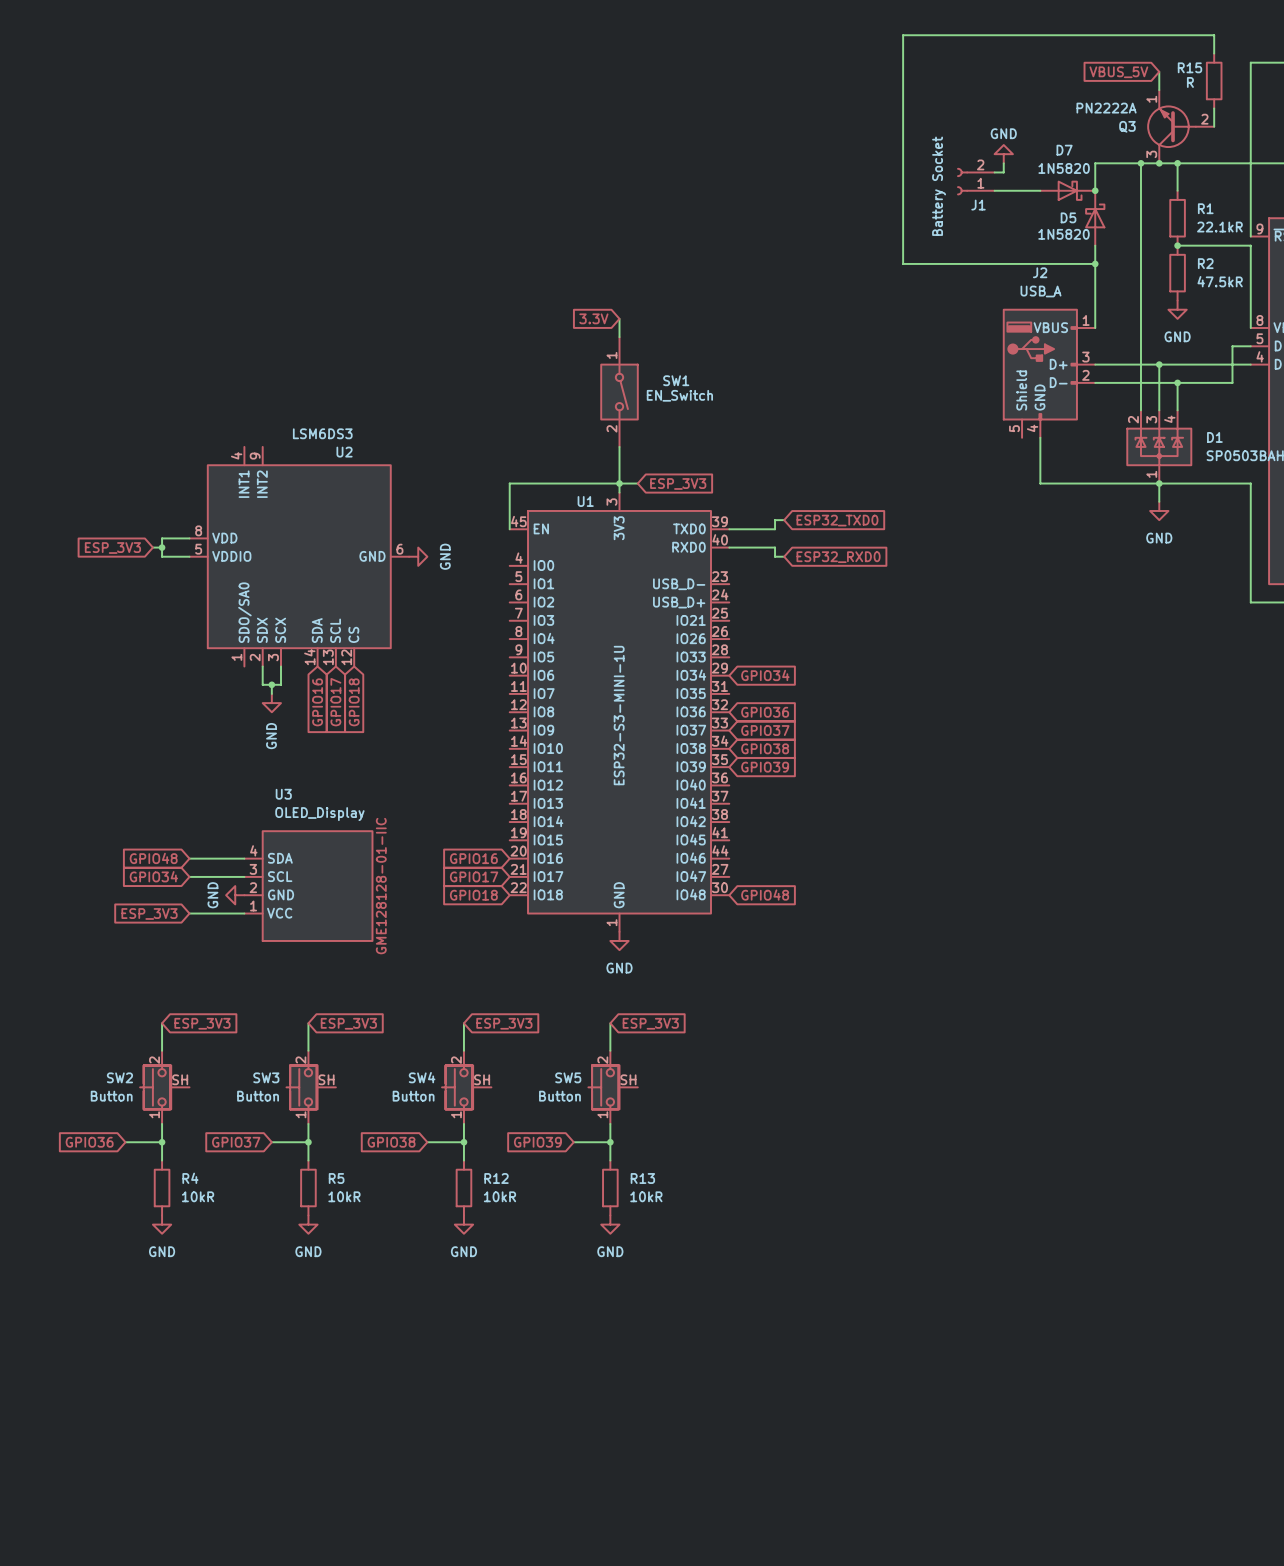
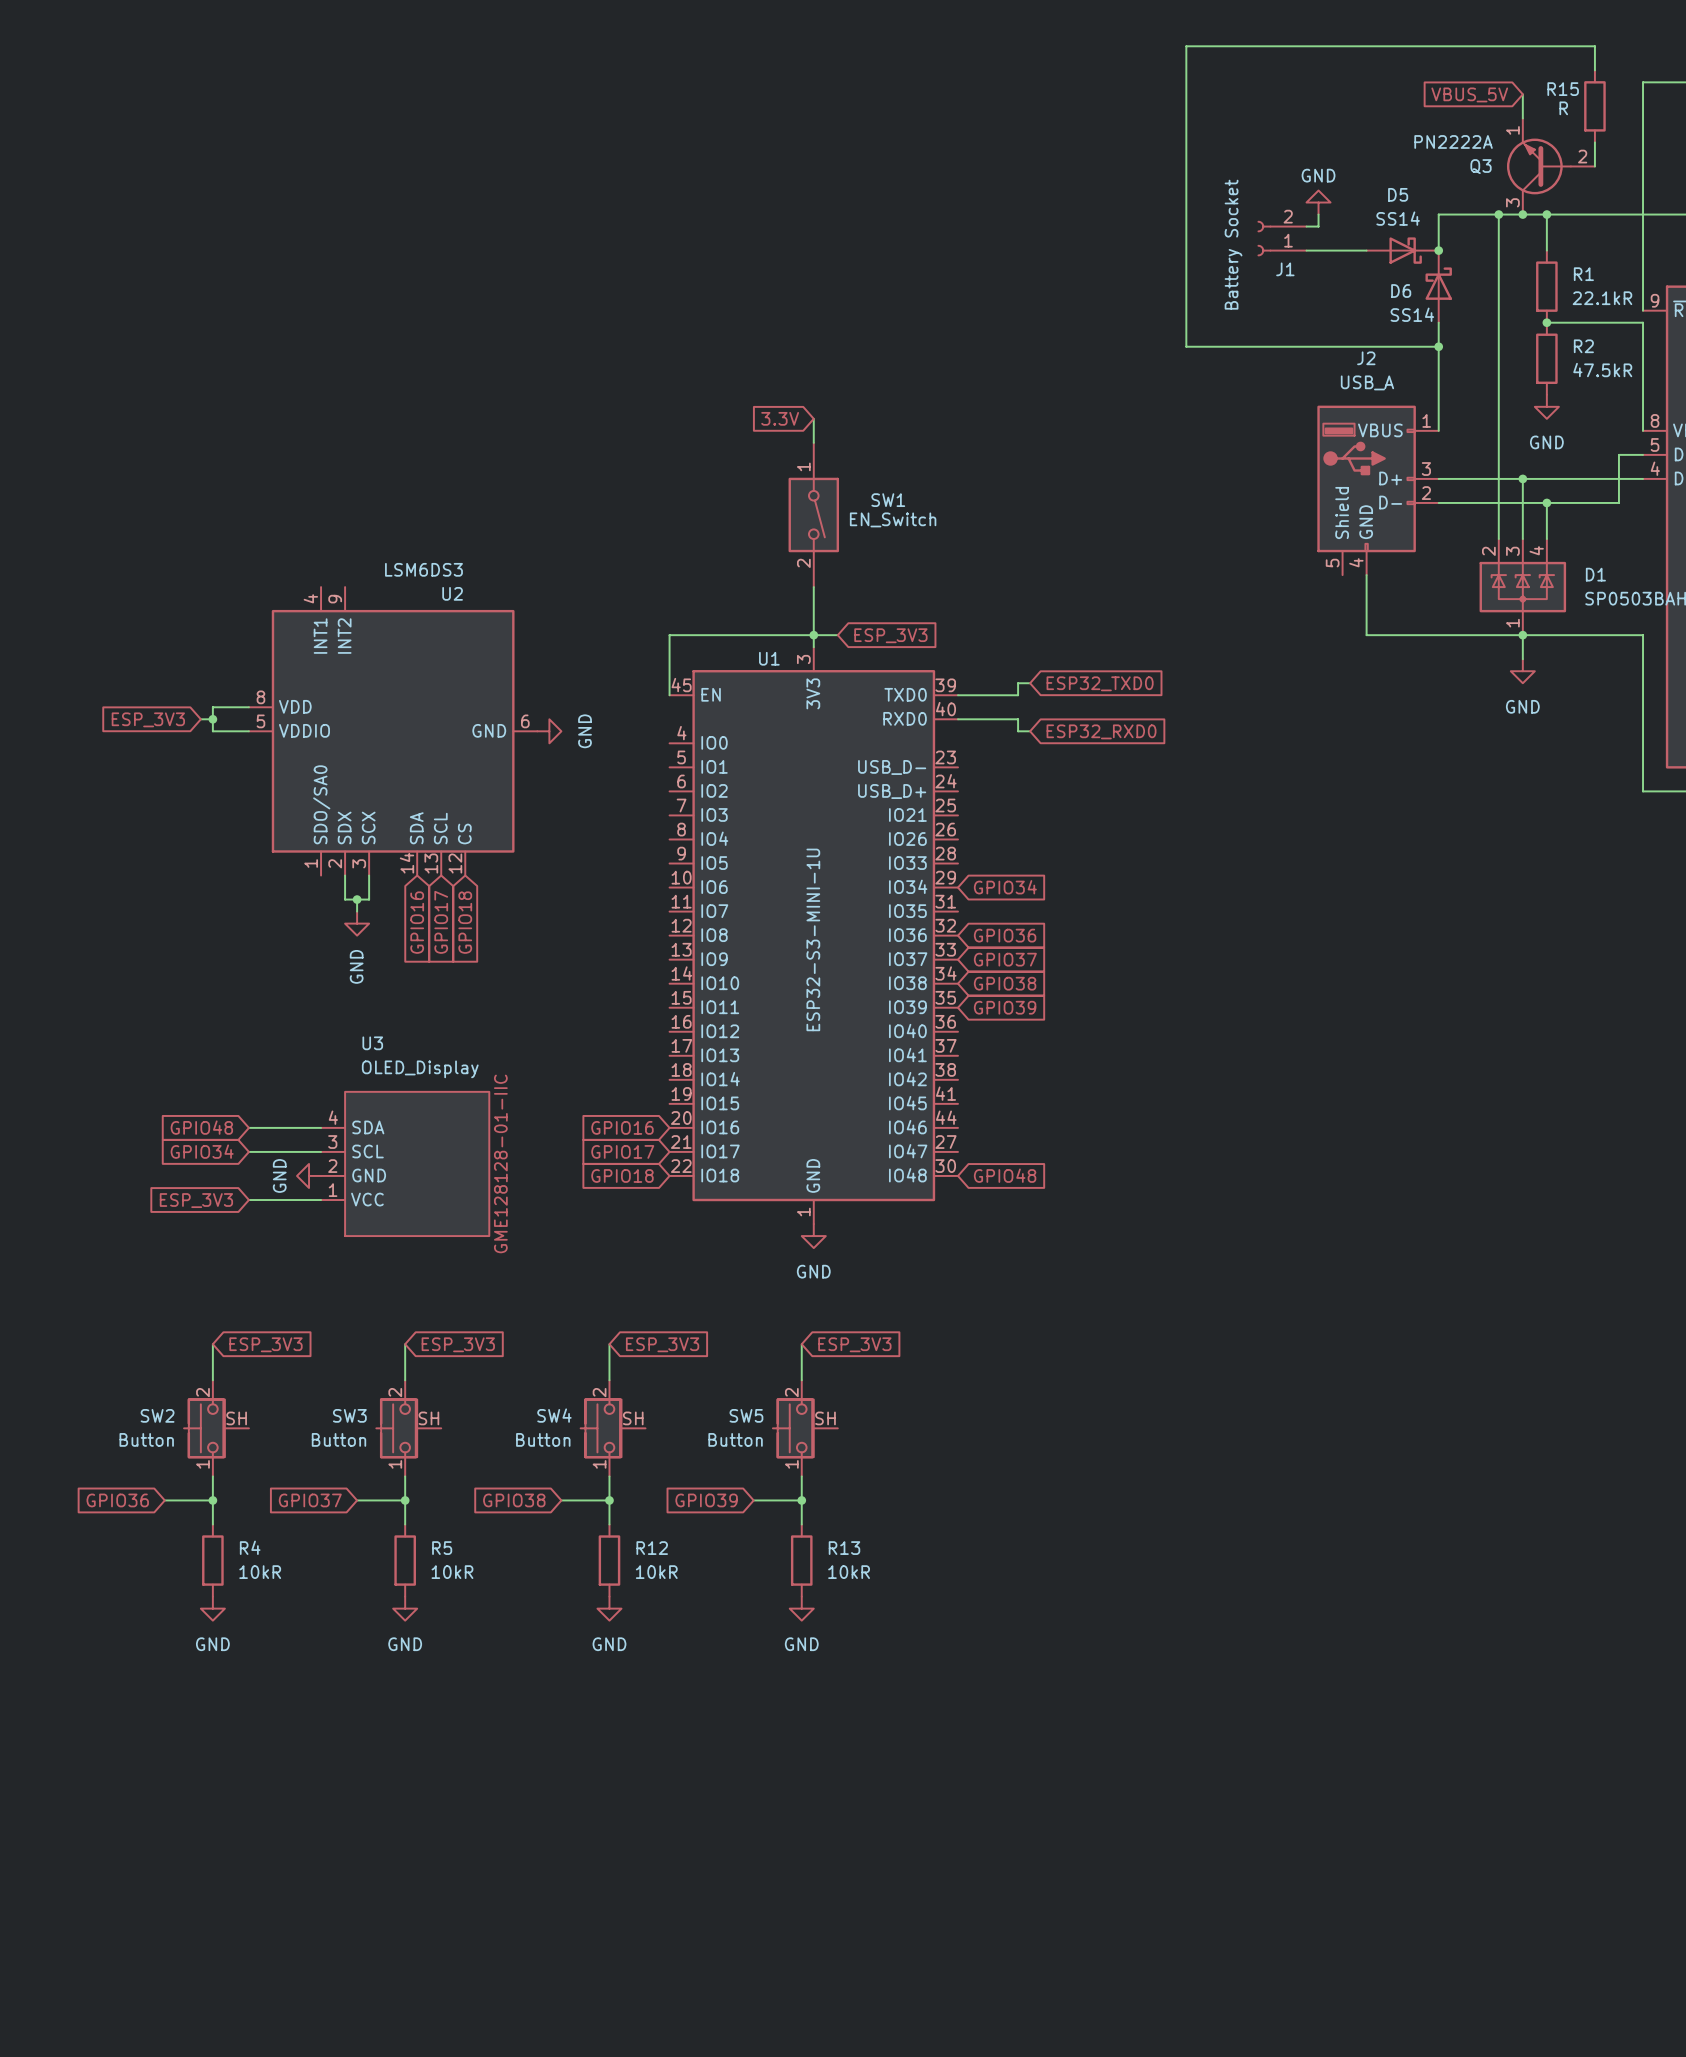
D7 name: D7 (1064, 150) -> D5 (1398, 194)
D7 value: 1N5820 (1064, 168) -> SS14 (1398, 218)
D5 name: D5 (1068, 217) -> D6 (1401, 291)
D5 value: 1N5820 (1063, 234) -> SS14 (1412, 314)

